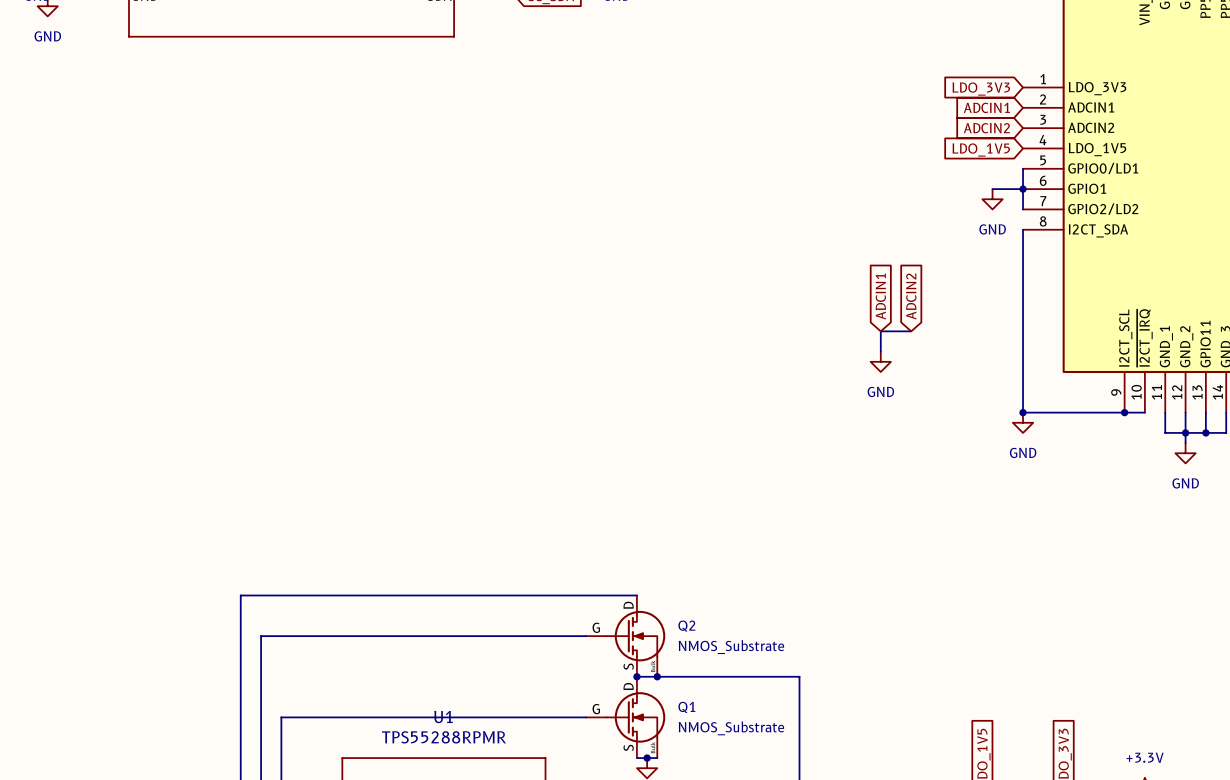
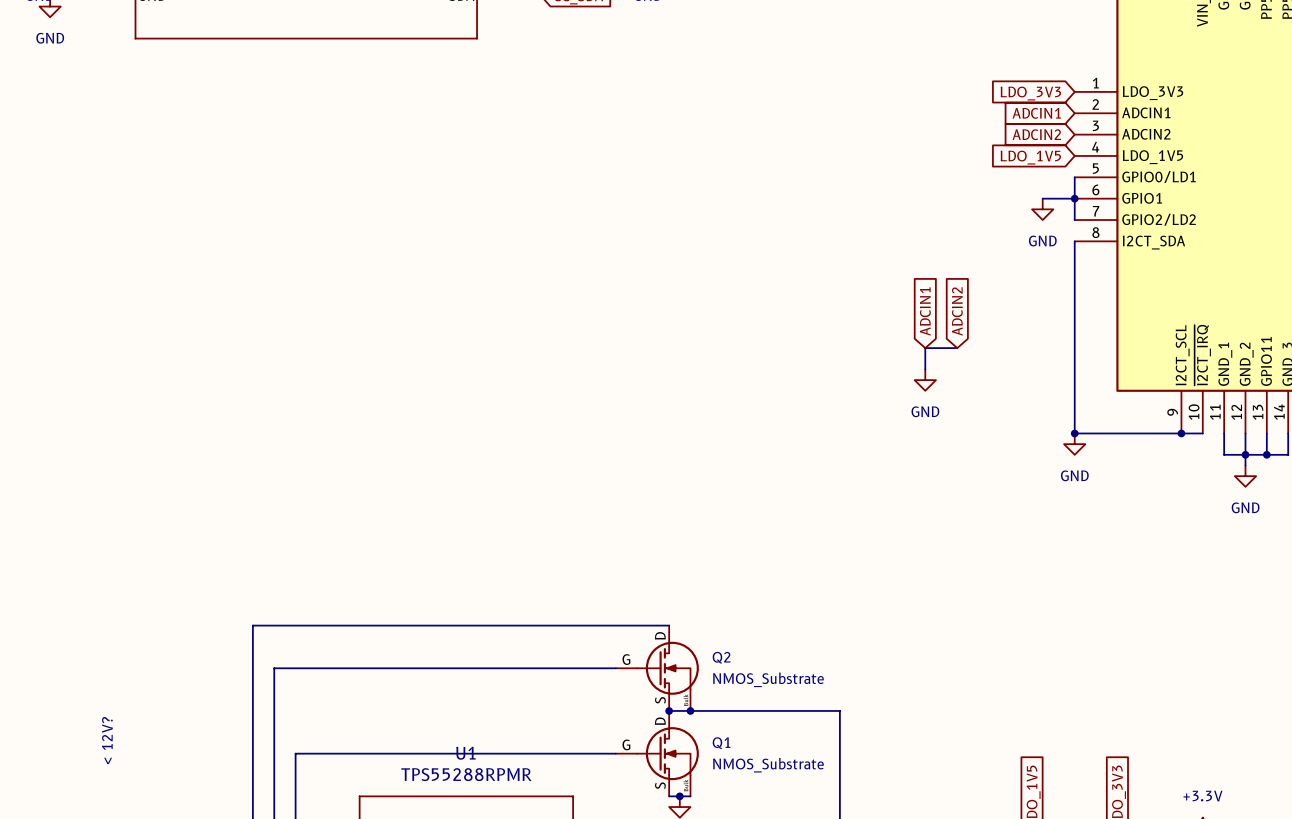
text: none -> < 12V? (107, 740)

